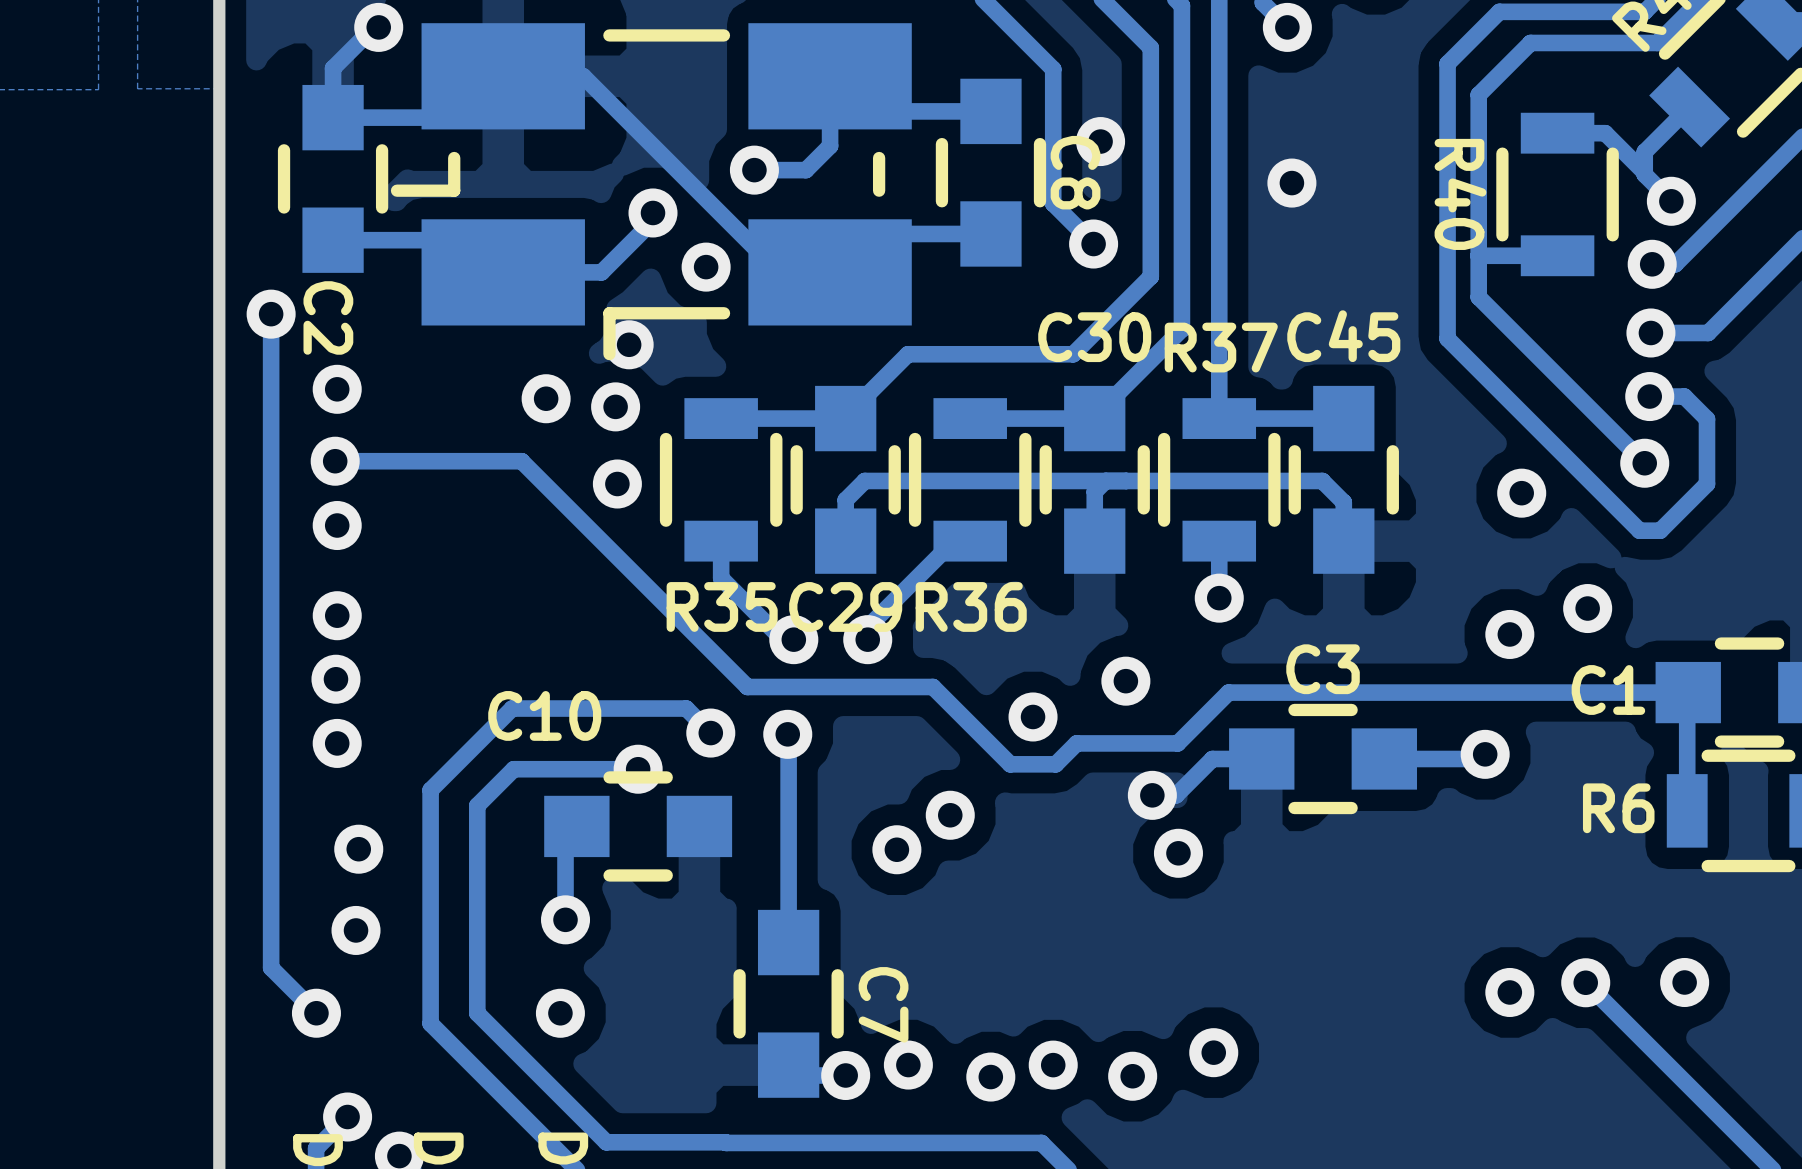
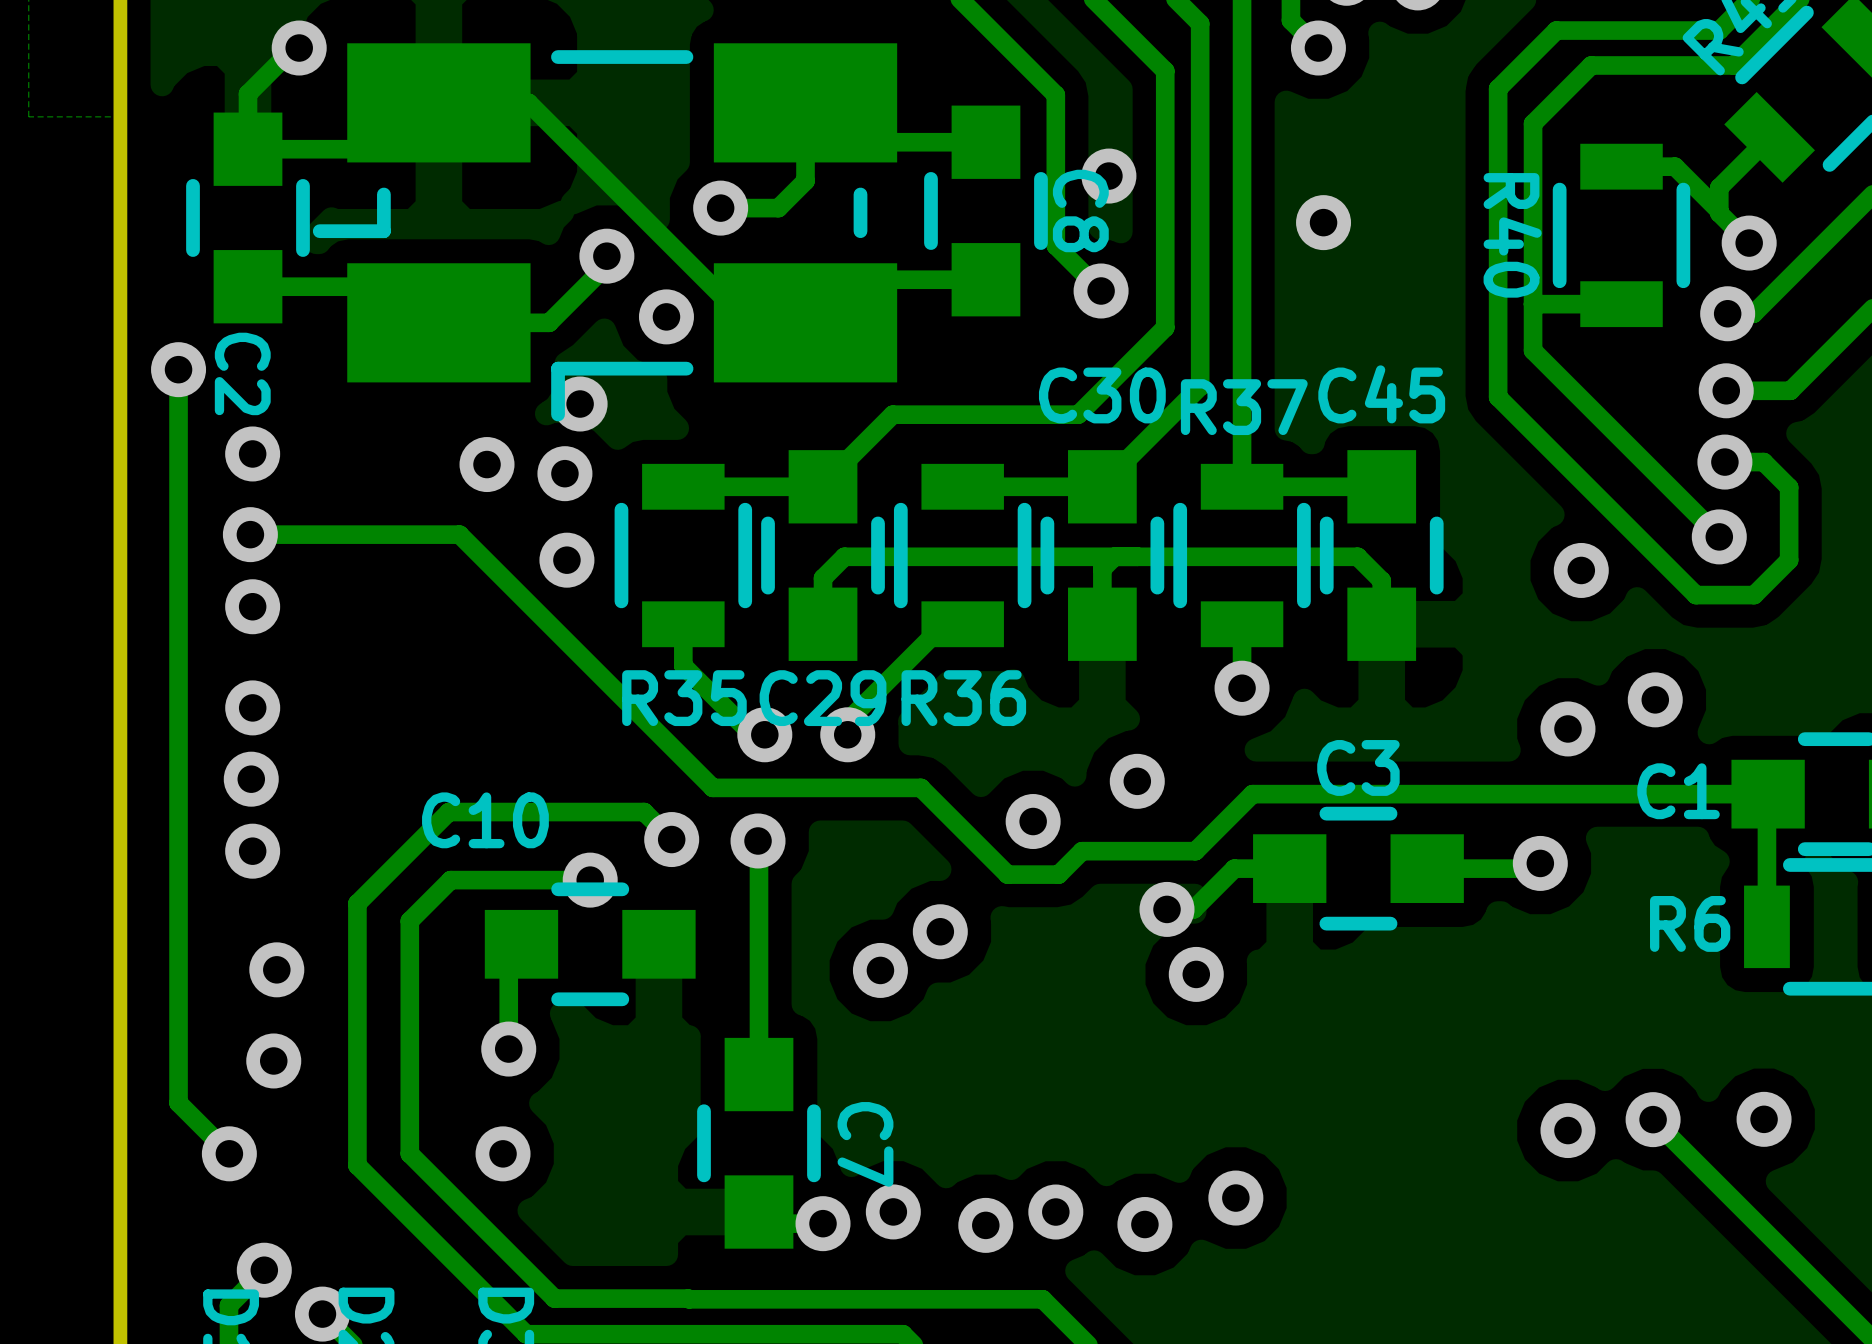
track: (1675, 515) (1660, 530) (1639, 530) (1623, 515) -> (1754, 595) (1696, 595)

